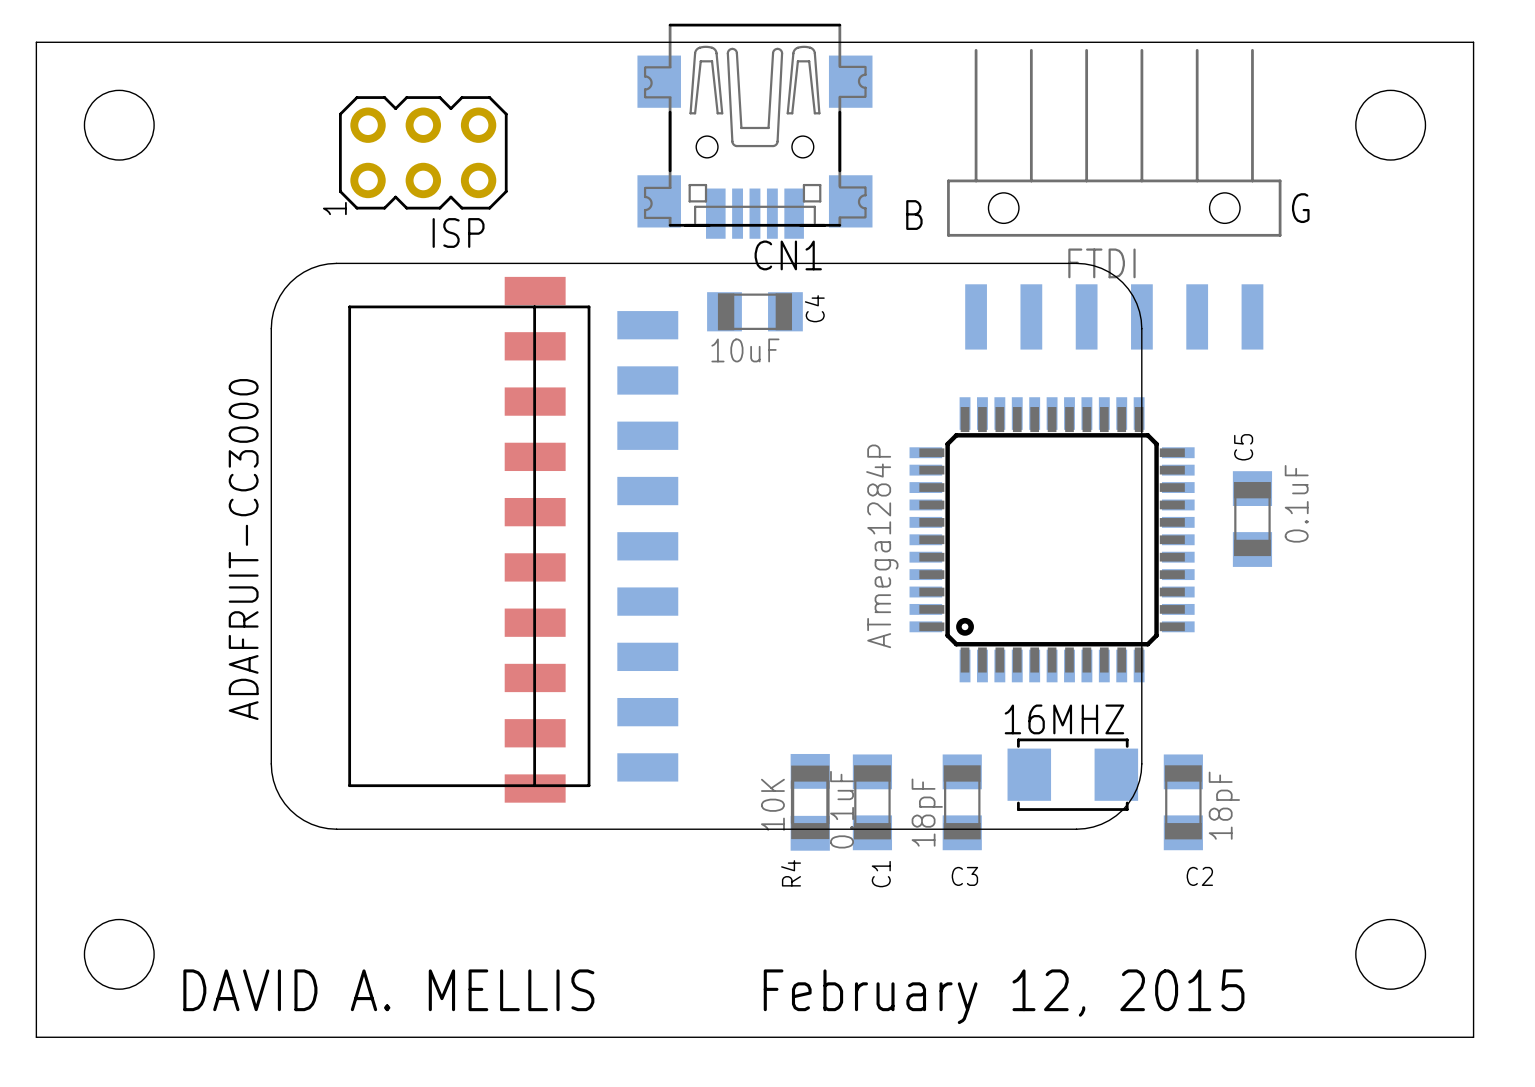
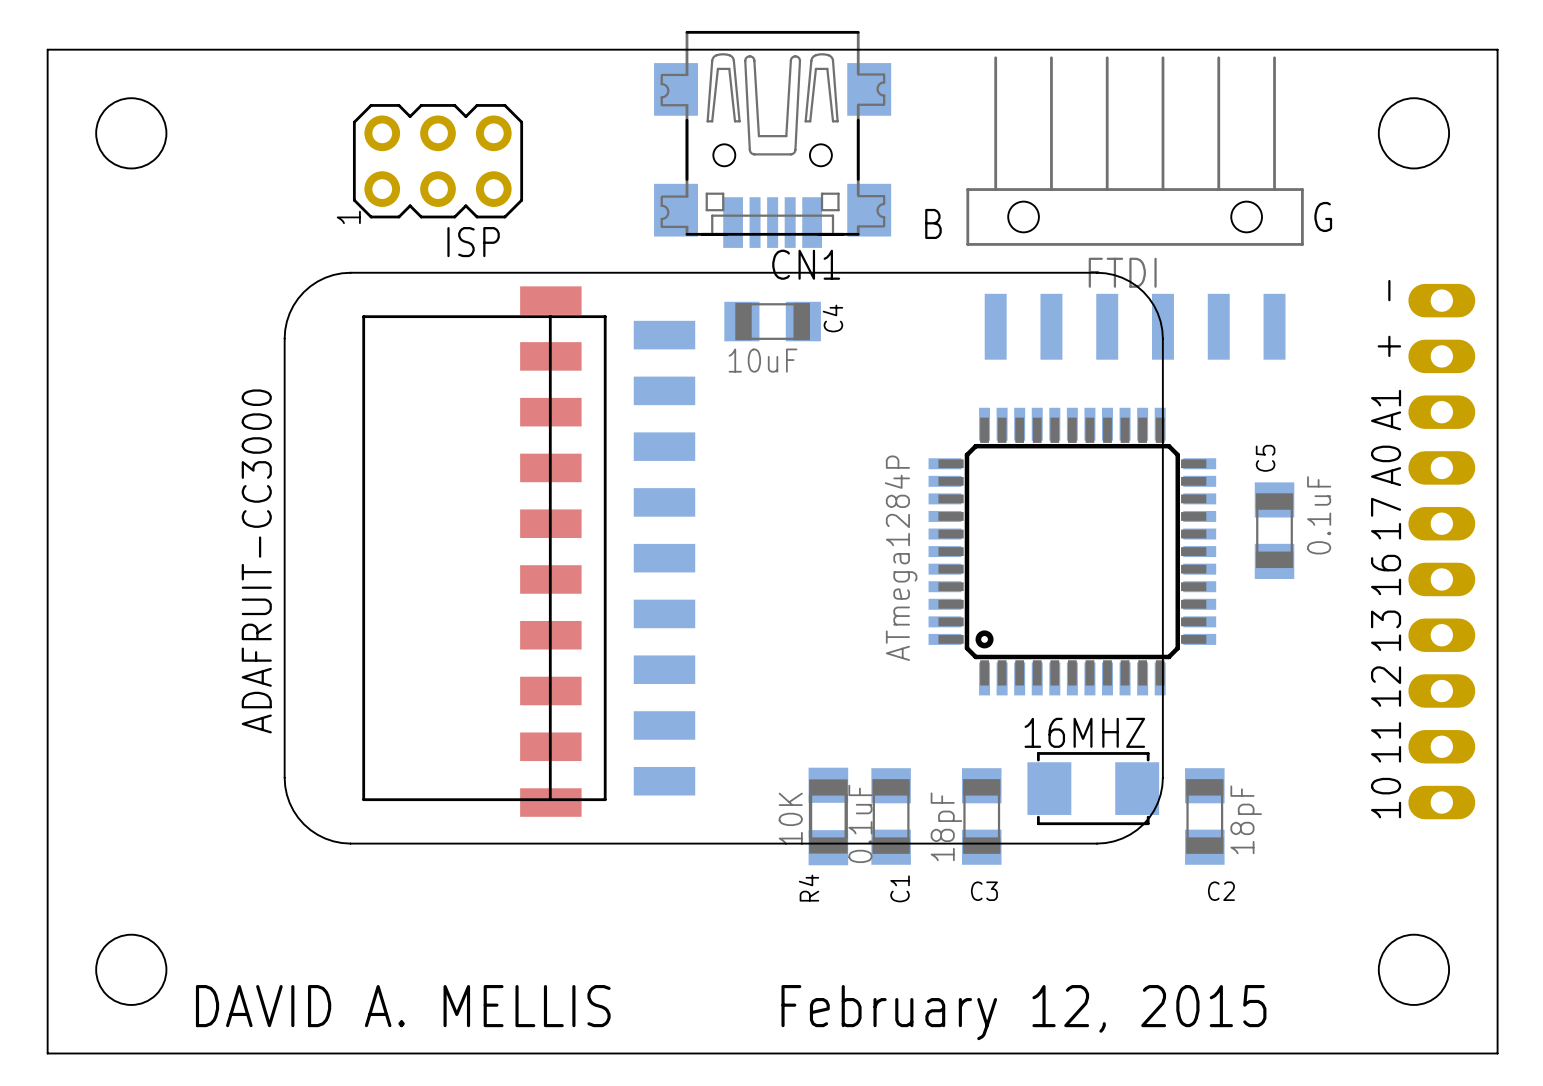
text: none -> - (1389, 290)
part: none -> (1441, 328)
text: none -> + (1389, 346)
text: none -> A1 (1386, 410)
part: none -> (1441, 440)
text: none -> A0 (1386, 465)
text: none -> 17 (1386, 518)
part: none -> (1441, 551)
text: none -> 16 (1386, 575)
text: none -> 13 (1386, 630)
text: none -> 12 (1386, 686)
part: none -> (1441, 718)
text: none -> 11 (1386, 742)
text: none -> 10 (1386, 798)

